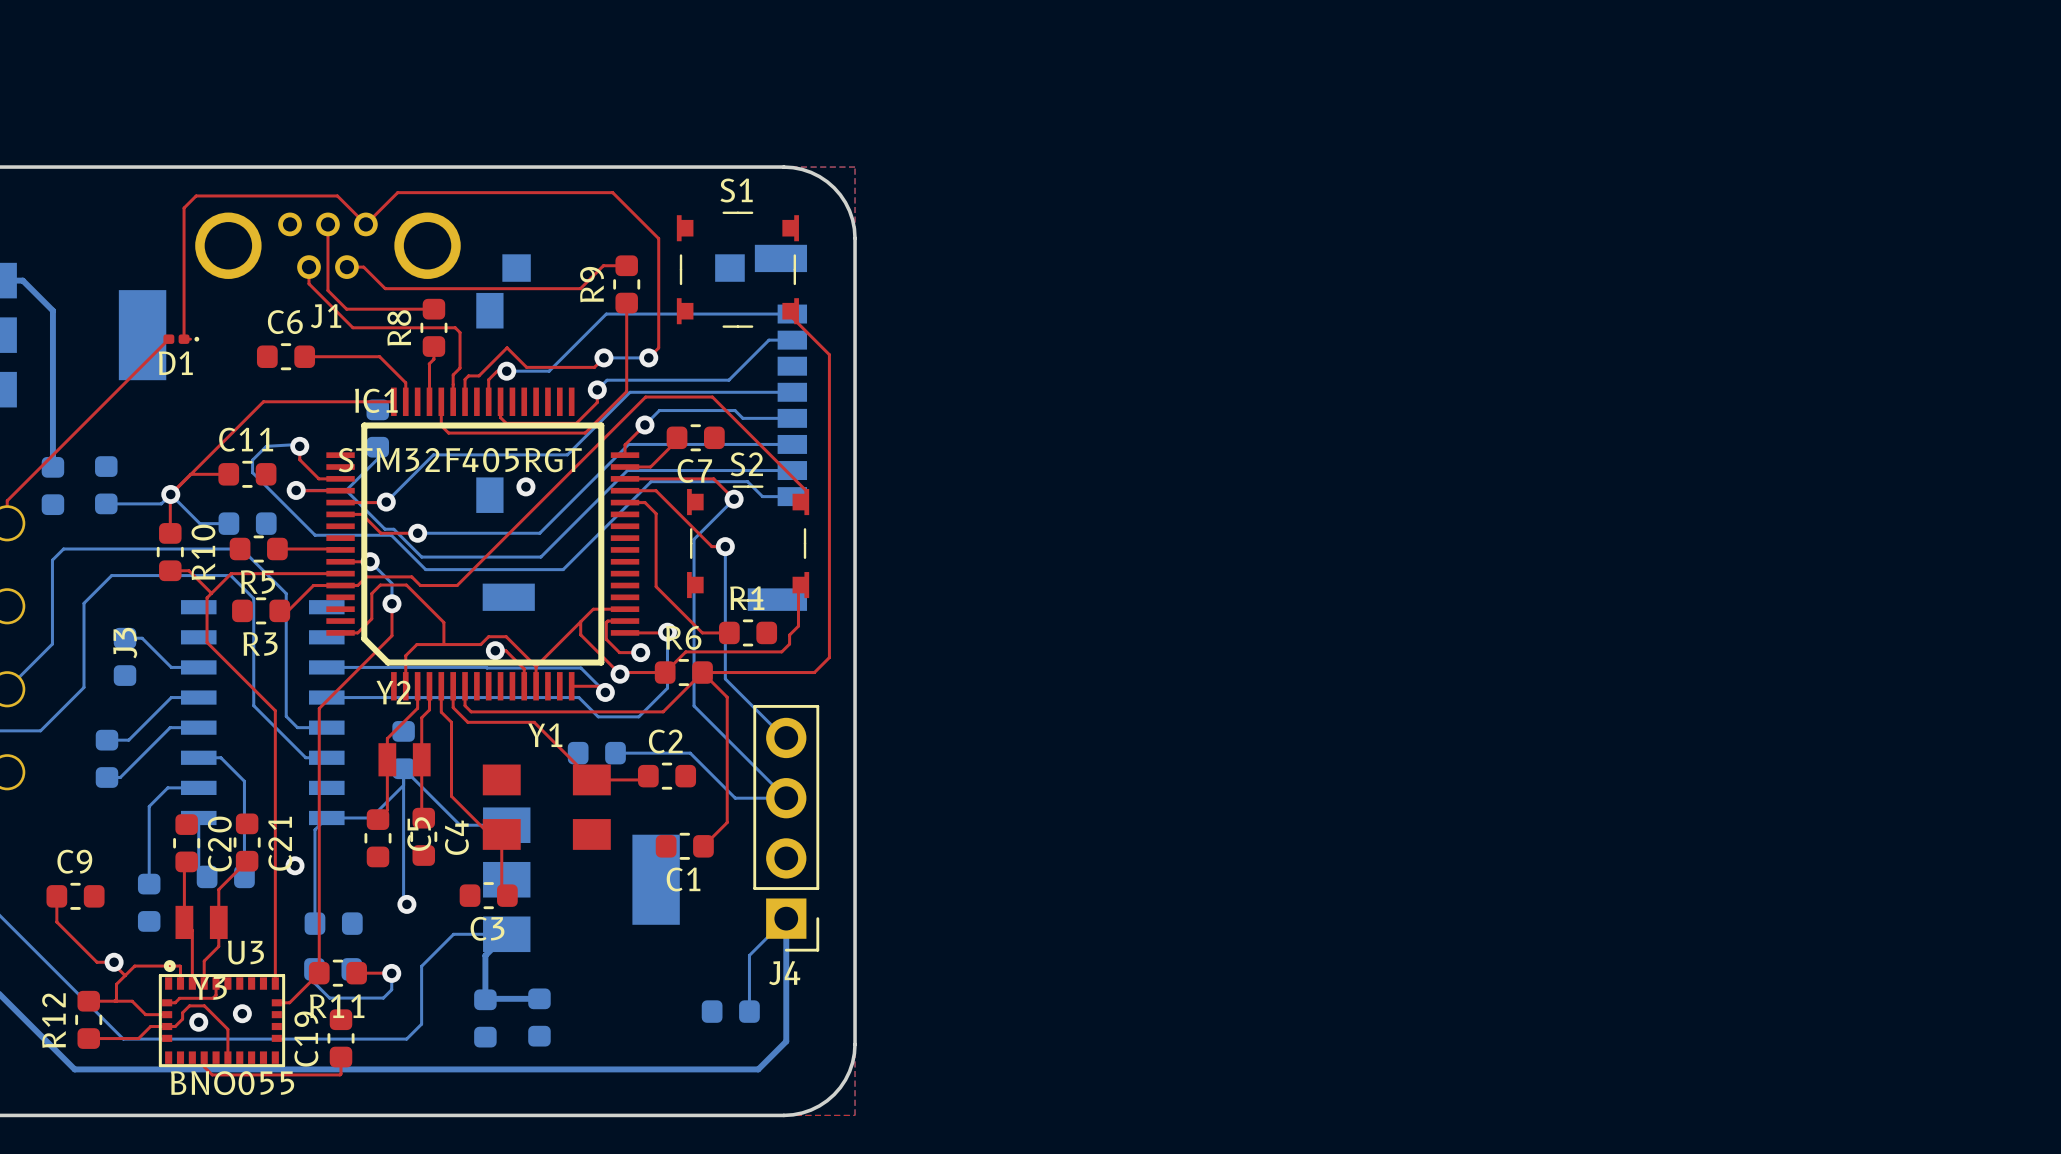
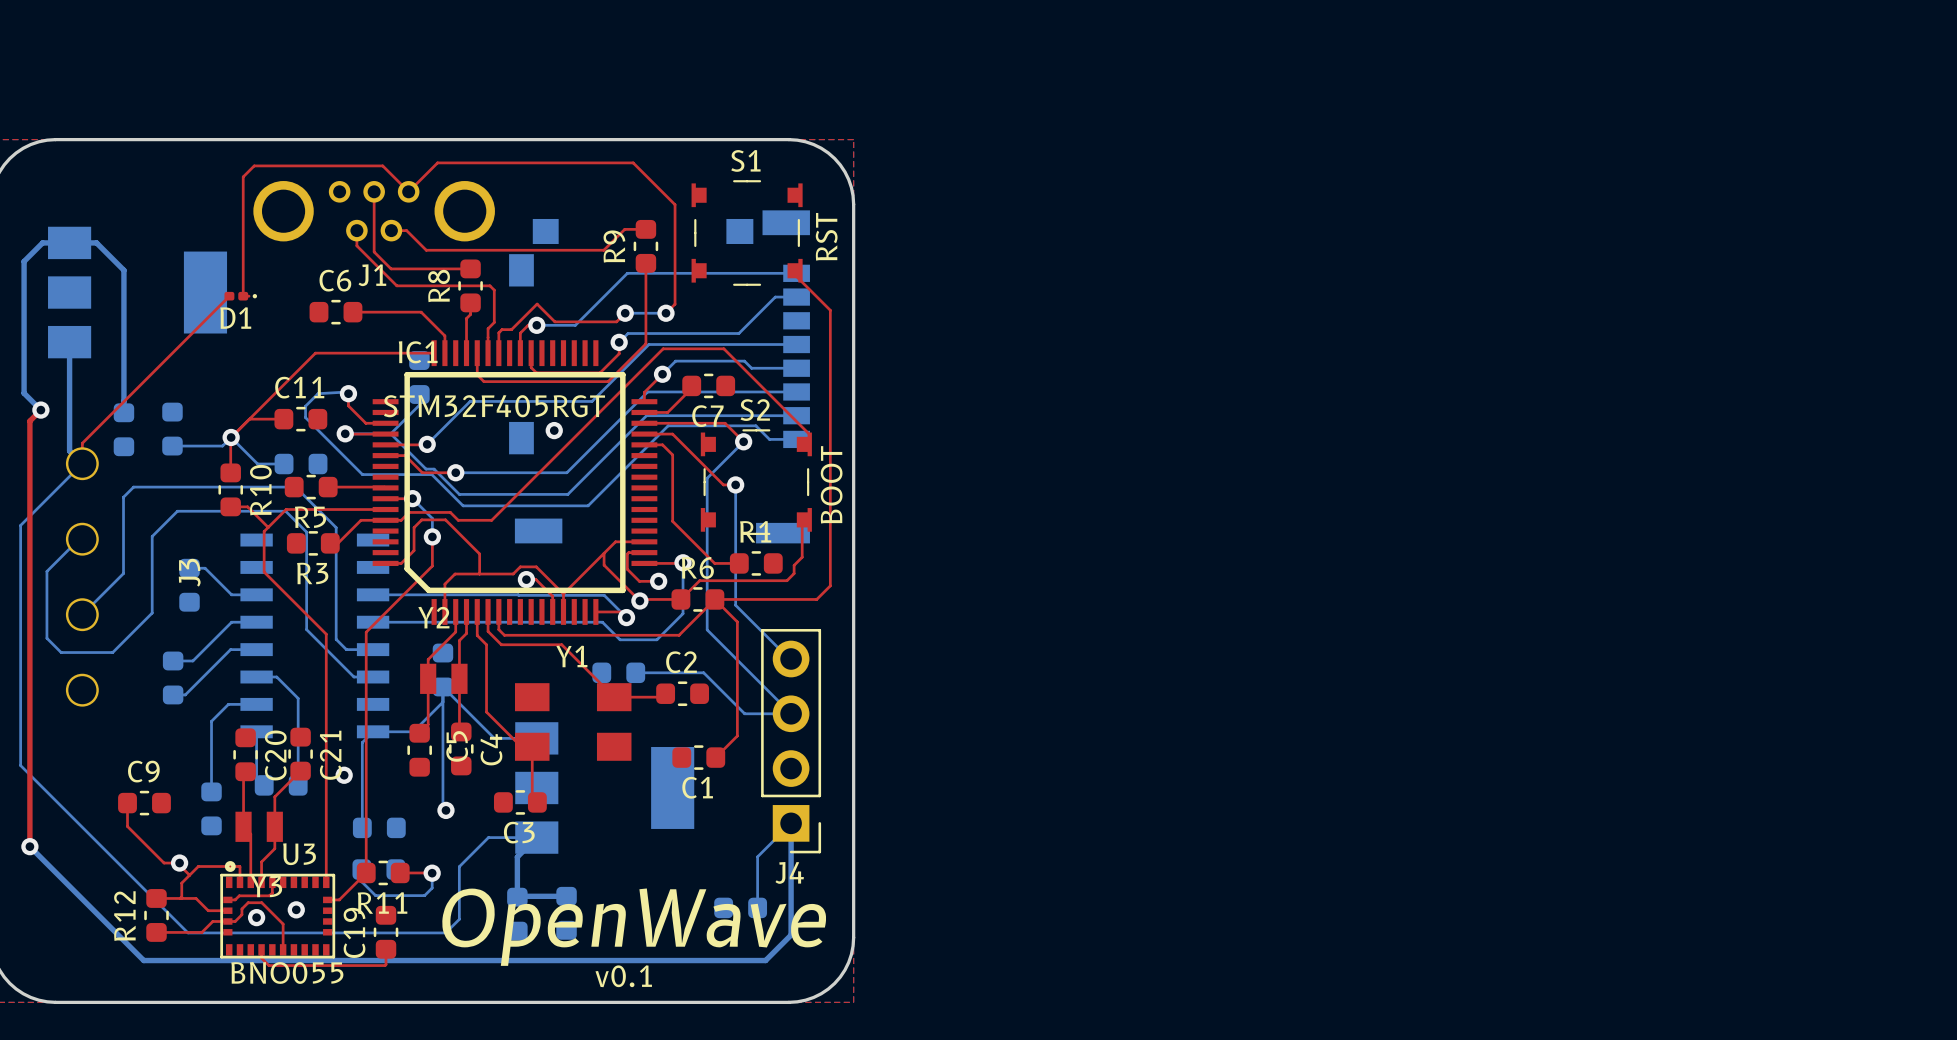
text: none -> RST (826, 236)
text: none -> BOOT (831, 484)
text: none -> OpenWave (634, 927)
text: none -> v0.1 (623, 976)

